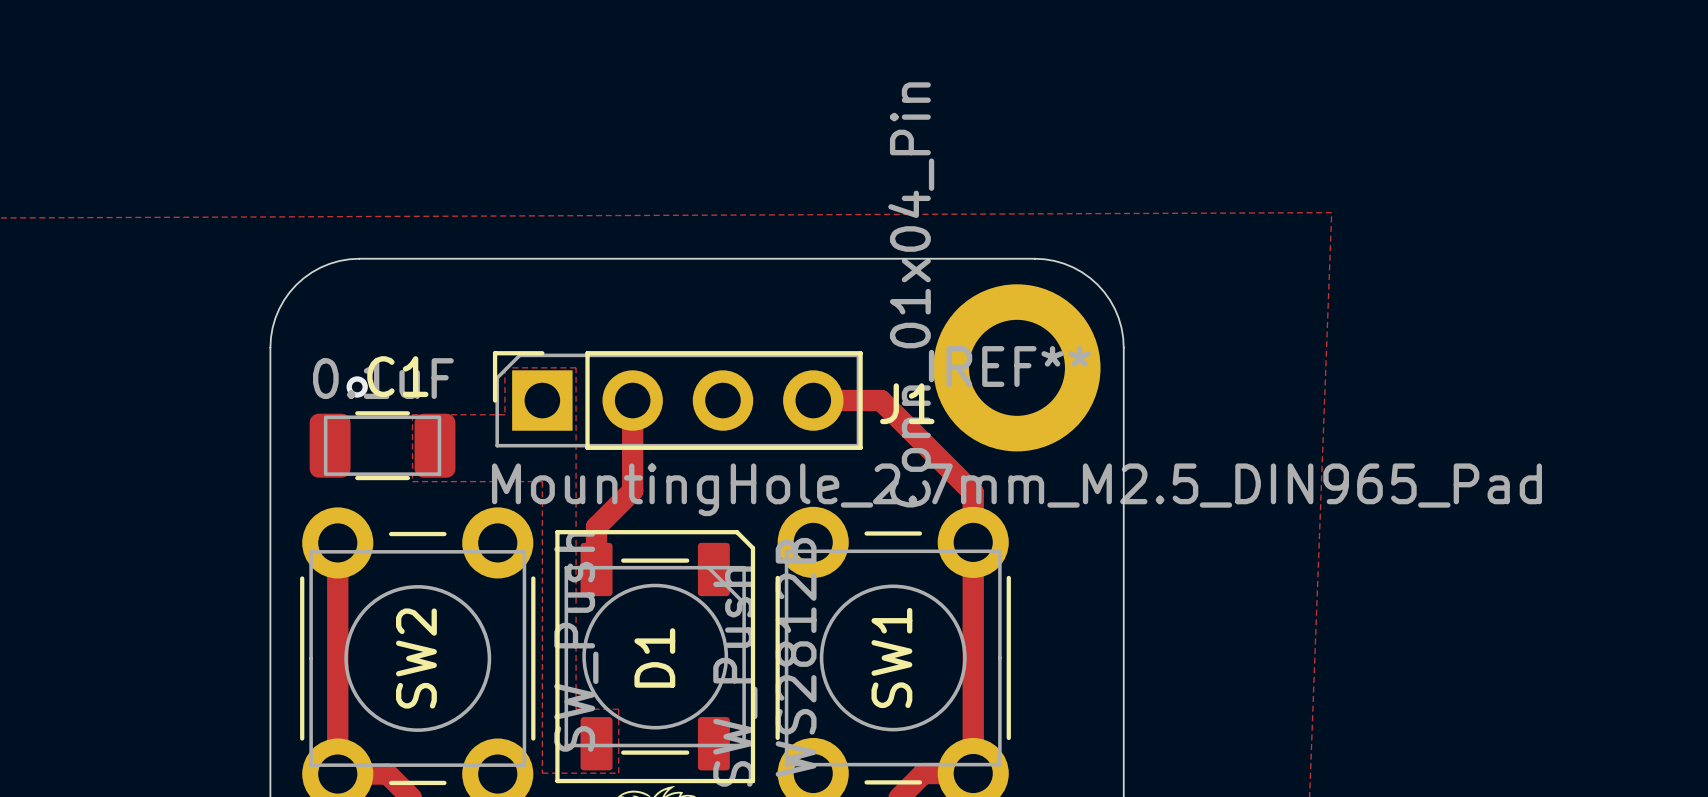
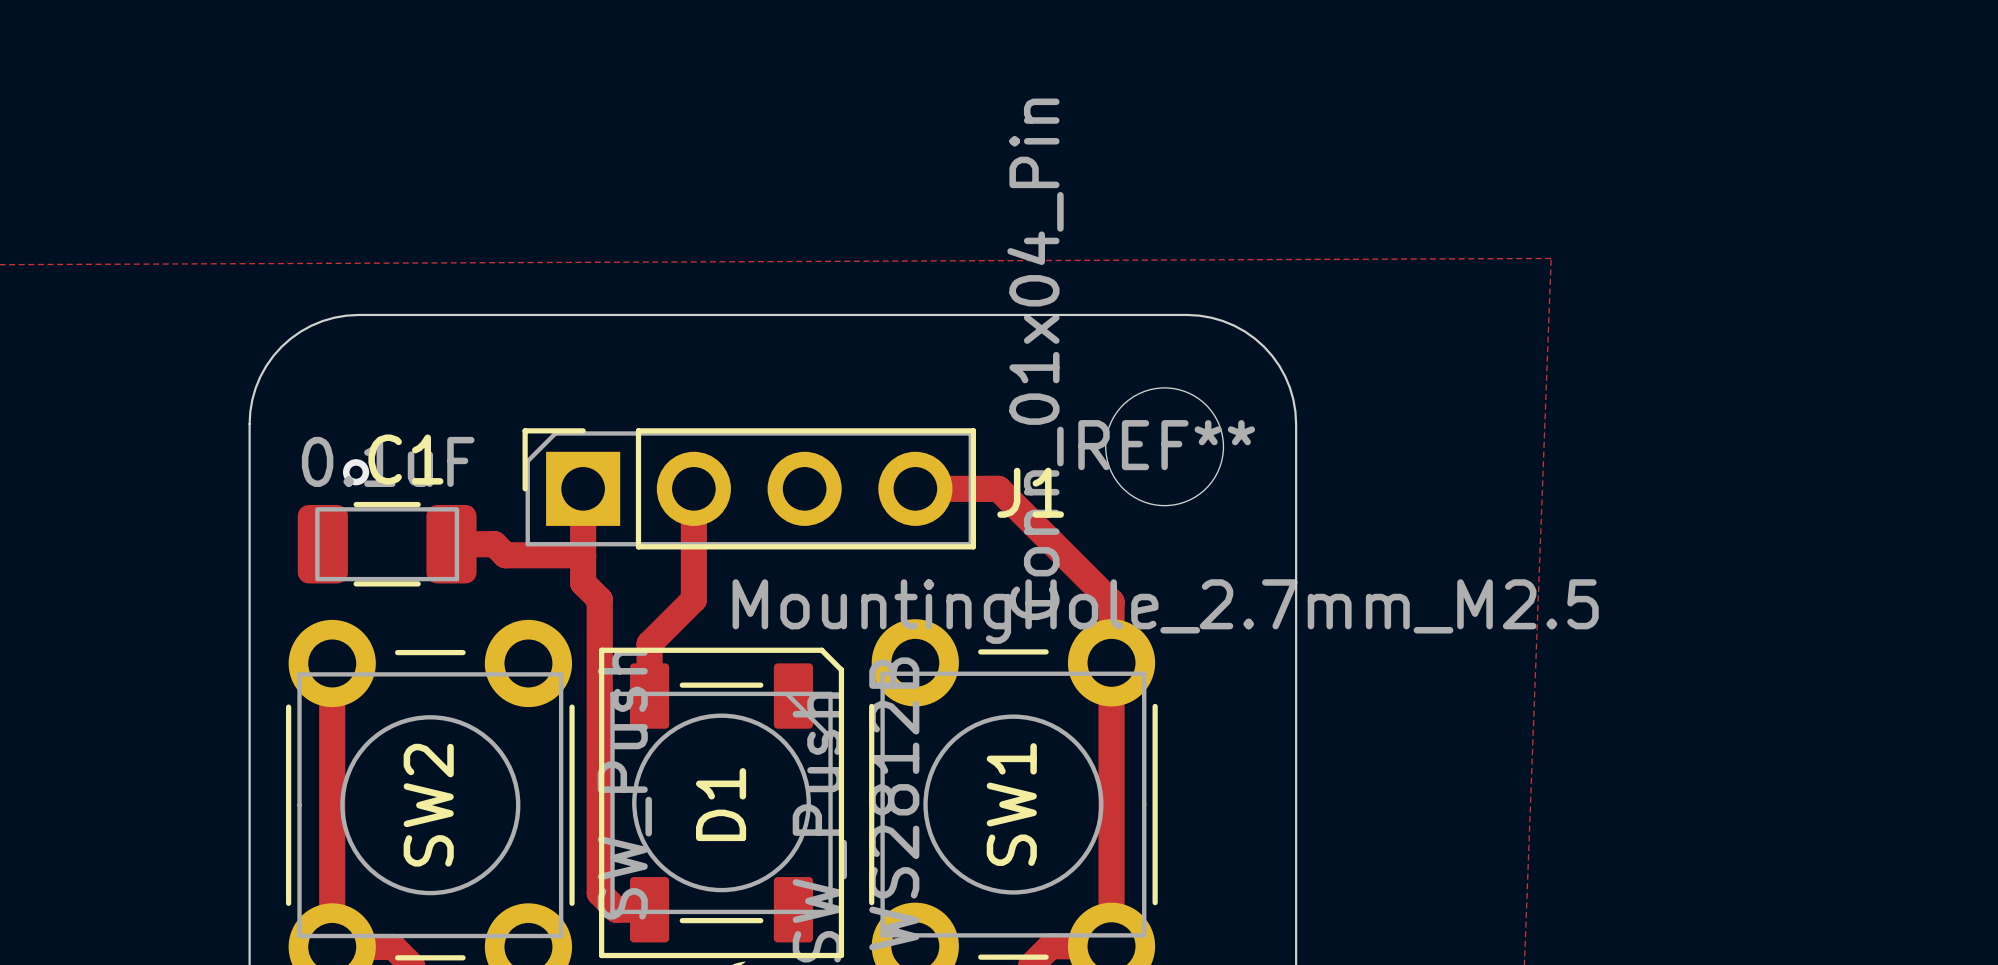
REF** footprint: [933, 284, 1101, 452] -> [1105, 387, 1224, 506]
zone outline: (504, 367) (576, 367) (576, 709) (618, 709) (618, 773) (542, 773) (542, 481) (412, 481) (412, 414) (504, 414) (504, 367) -> none
track: none -> (583, 488) (583, 582) (599, 599) (599, 893) (616, 909) (649, 909)
track: none -> (451, 544) (494, 544) (505, 555) (583, 555)
REF** value: MountingHole_2.7mm_M2.5_DIN965_Pad (1016, 489) -> MountingHole_2.7mm_M2.5 (1165, 611)

